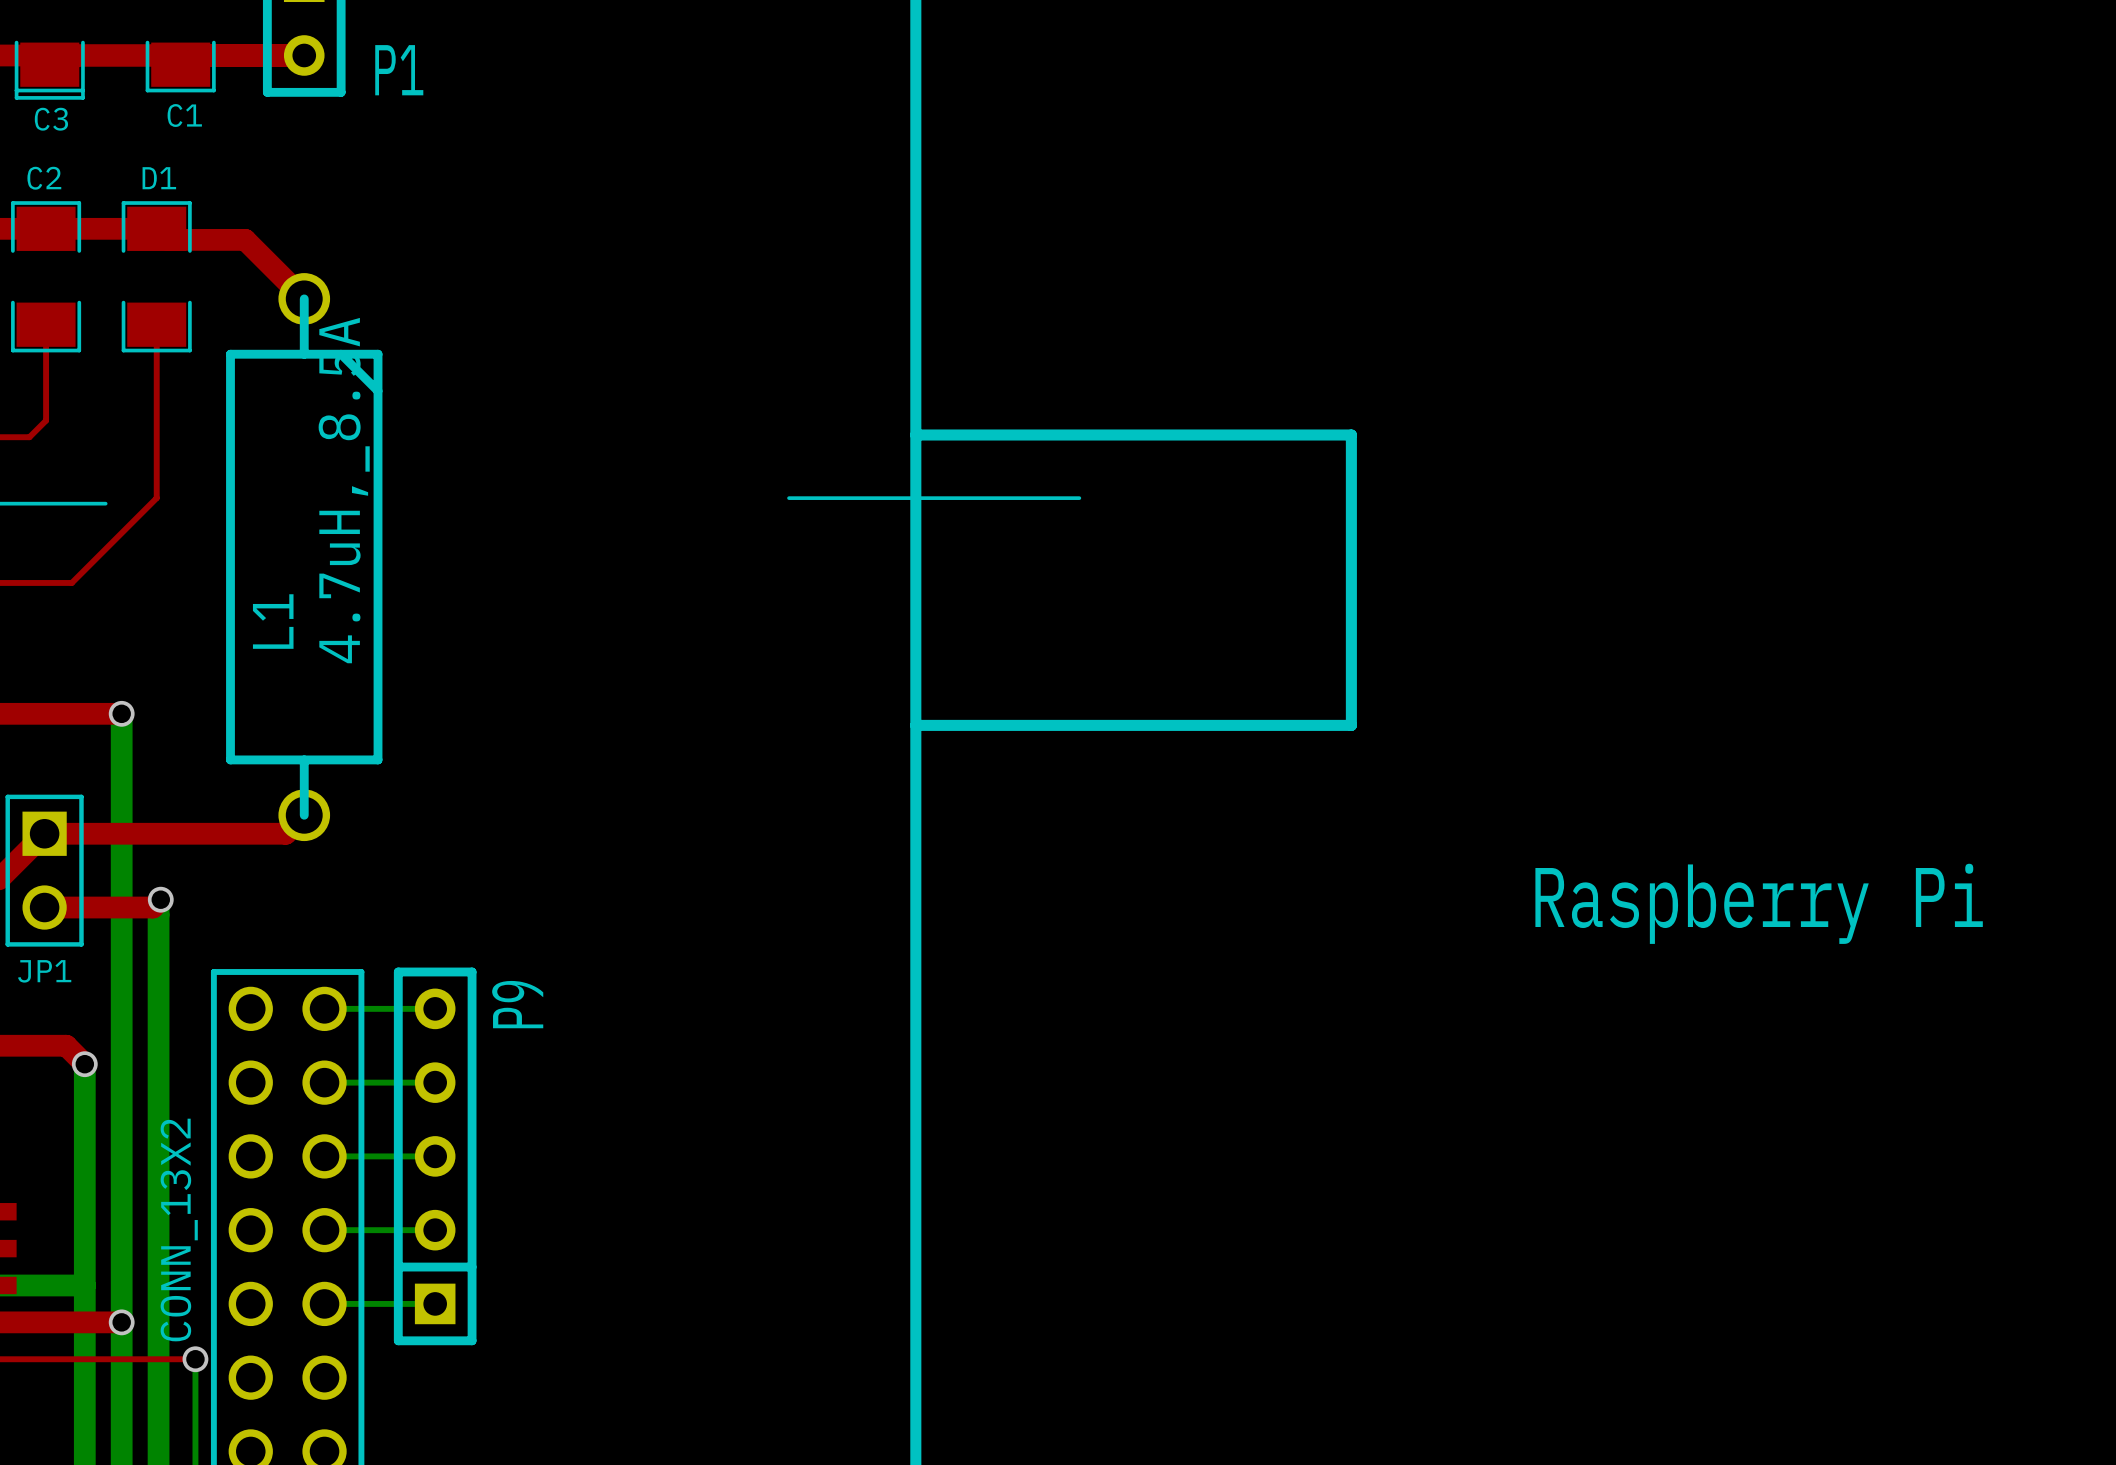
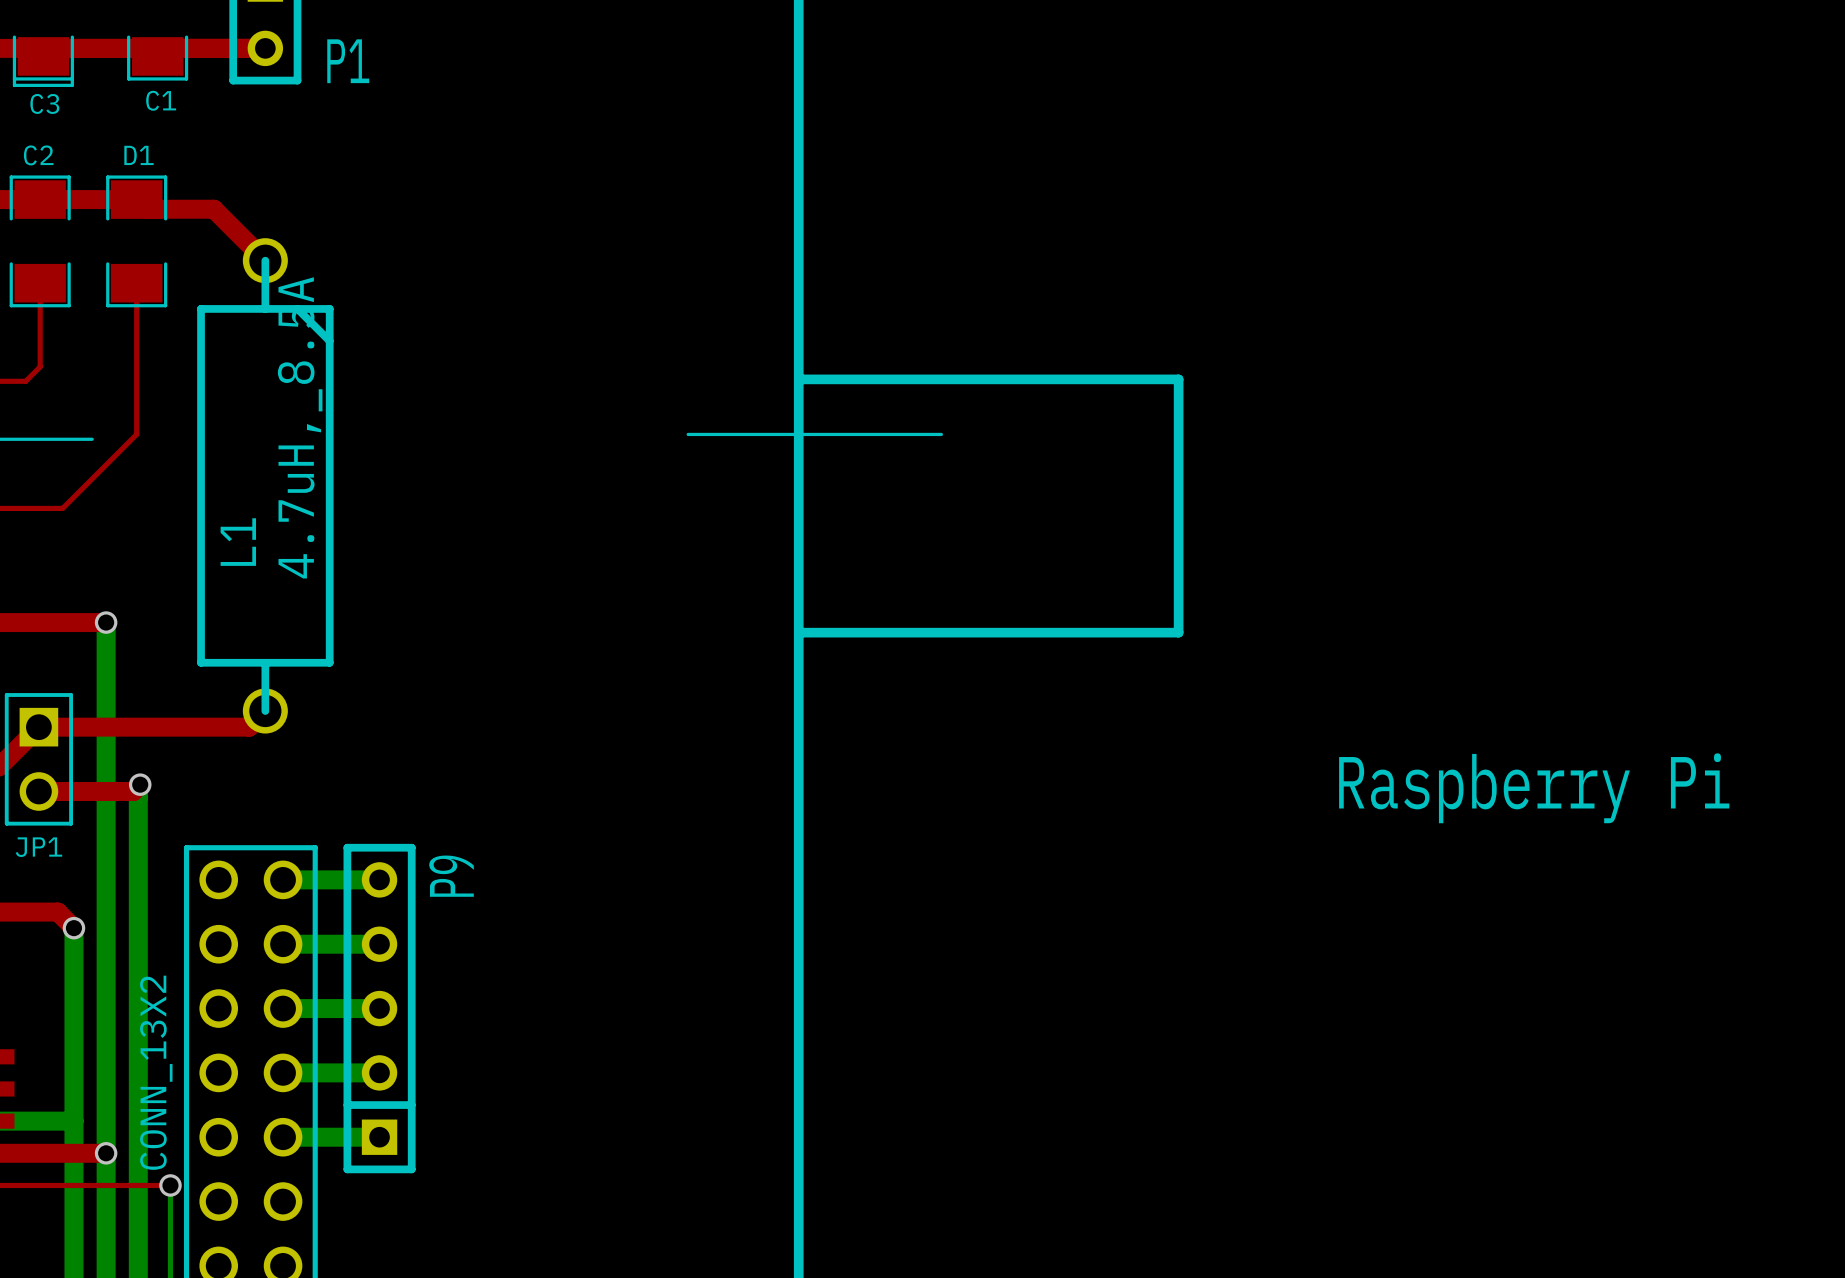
bottom track width: thin (324, 1008) (435, 1008) -> thick (283, 879) (379, 879)
bottom track width: thin (324, 1082) (435, 1082) -> thick (283, 944) (379, 944)
bottom track width: thin (324, 1156) (435, 1156) -> thick (283, 1008) (379, 1008)
bottom track width: thin (324, 1230) (435, 1230) -> thick (283, 1072) (379, 1072)
bottom track width: thin (324, 1303) (435, 1303) -> thick (283, 1137) (379, 1137)

